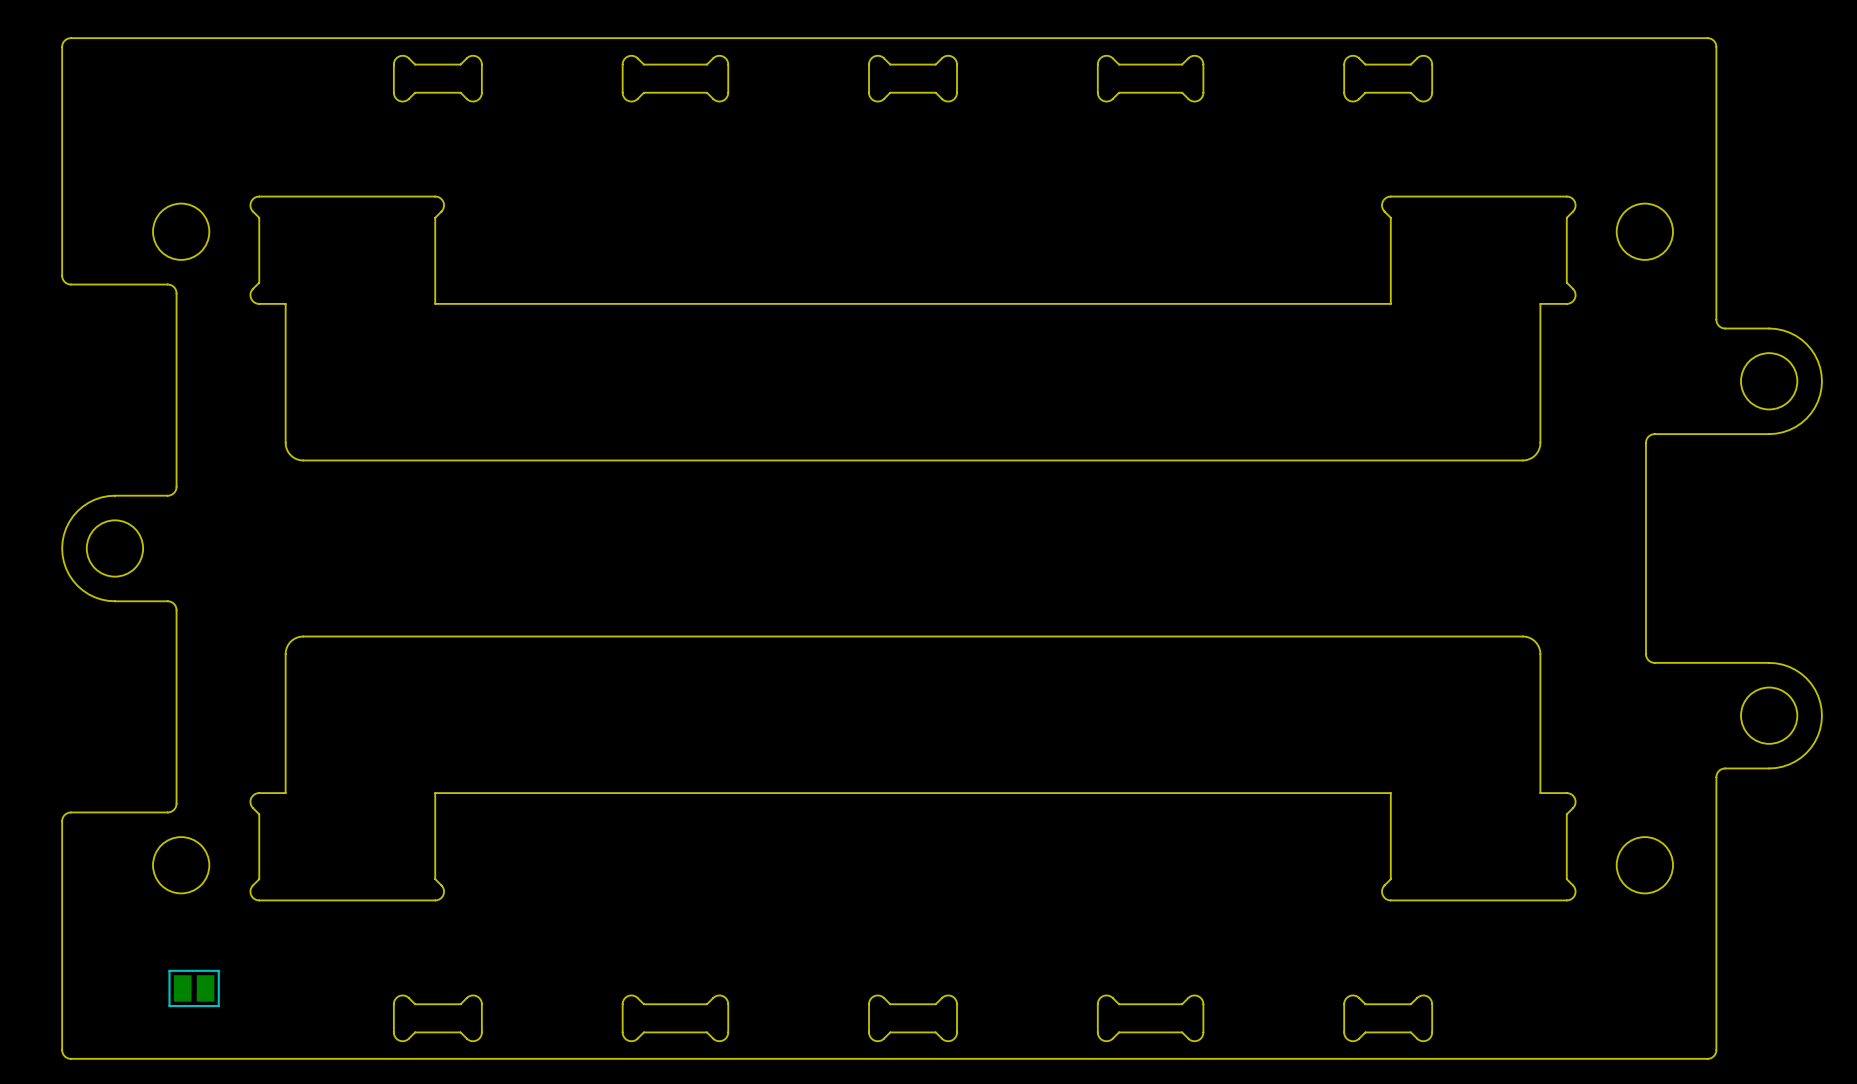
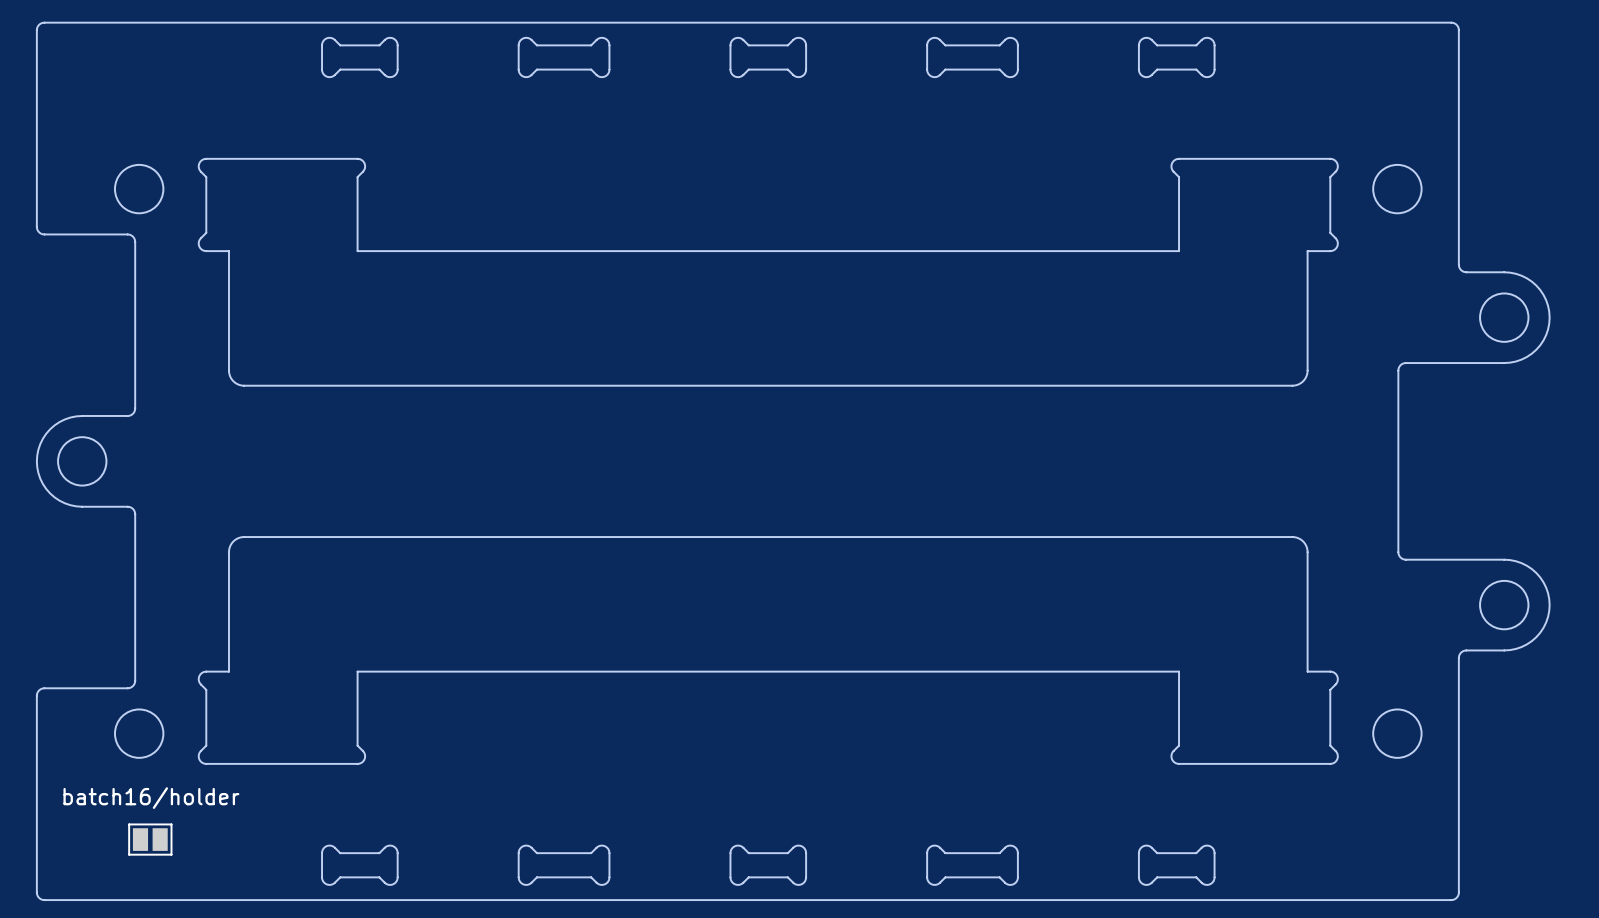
text: none -> batch16/holder (151, 798)

